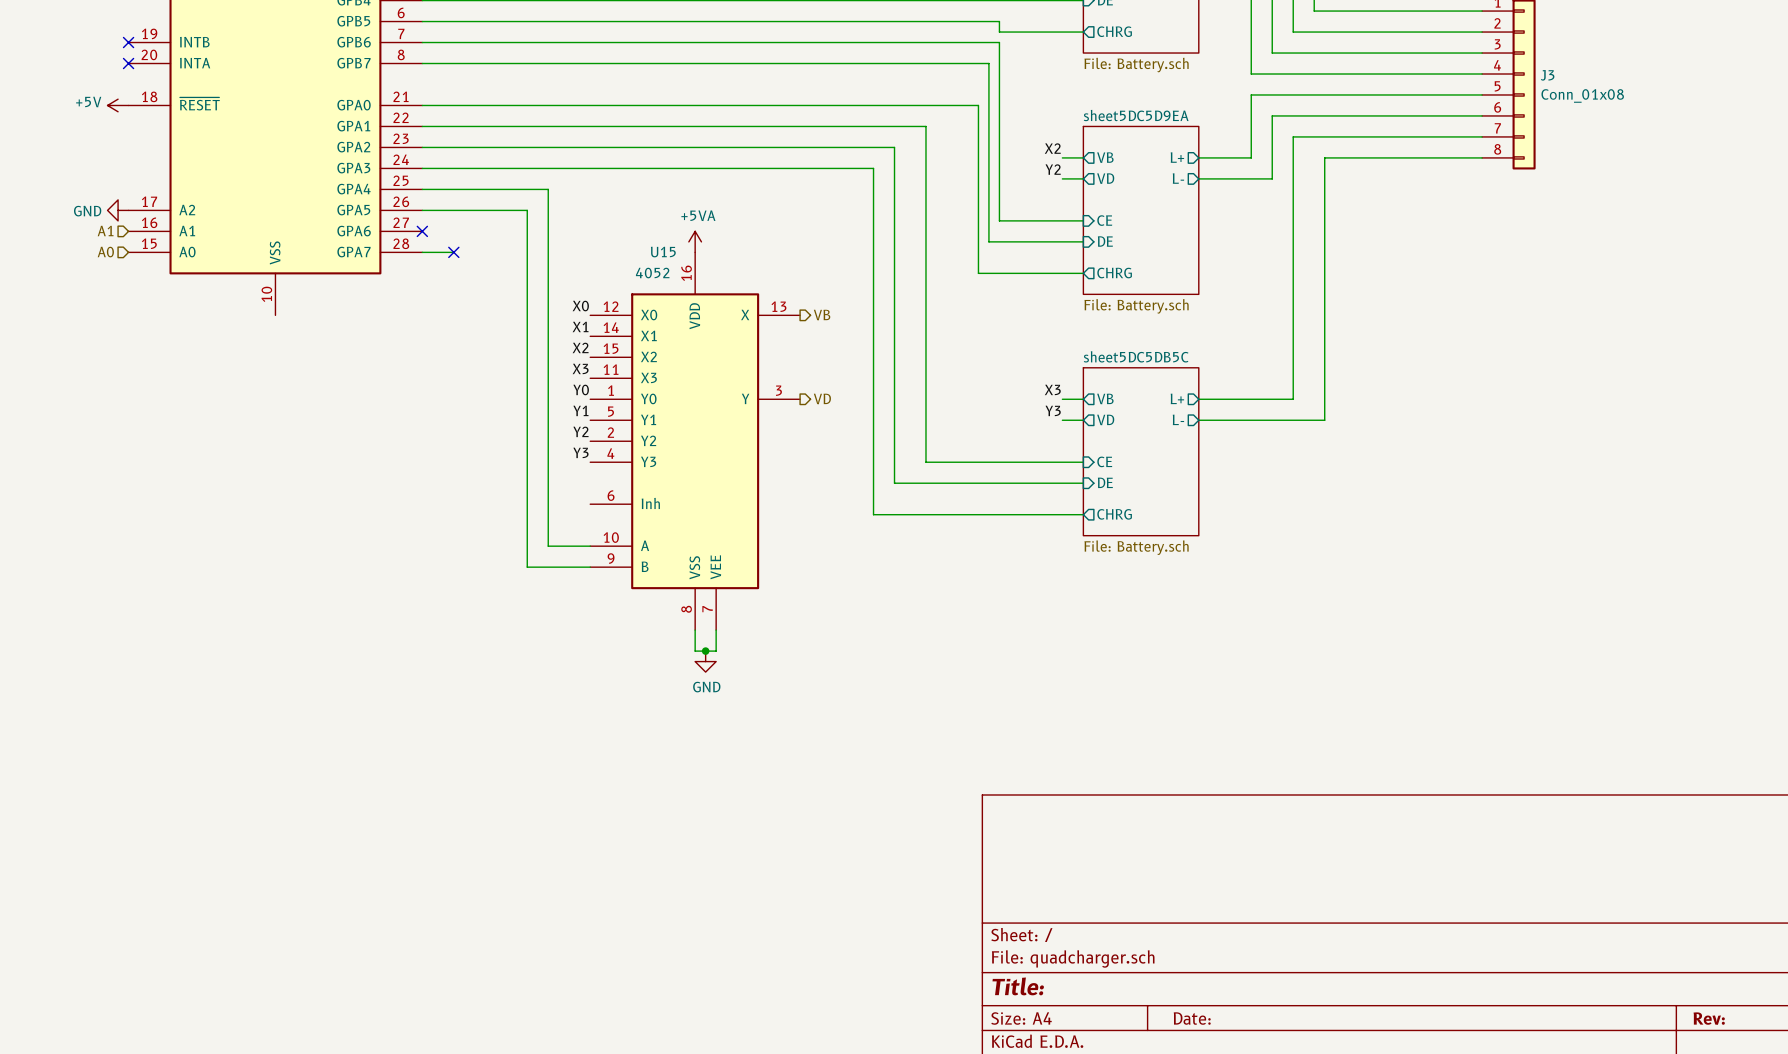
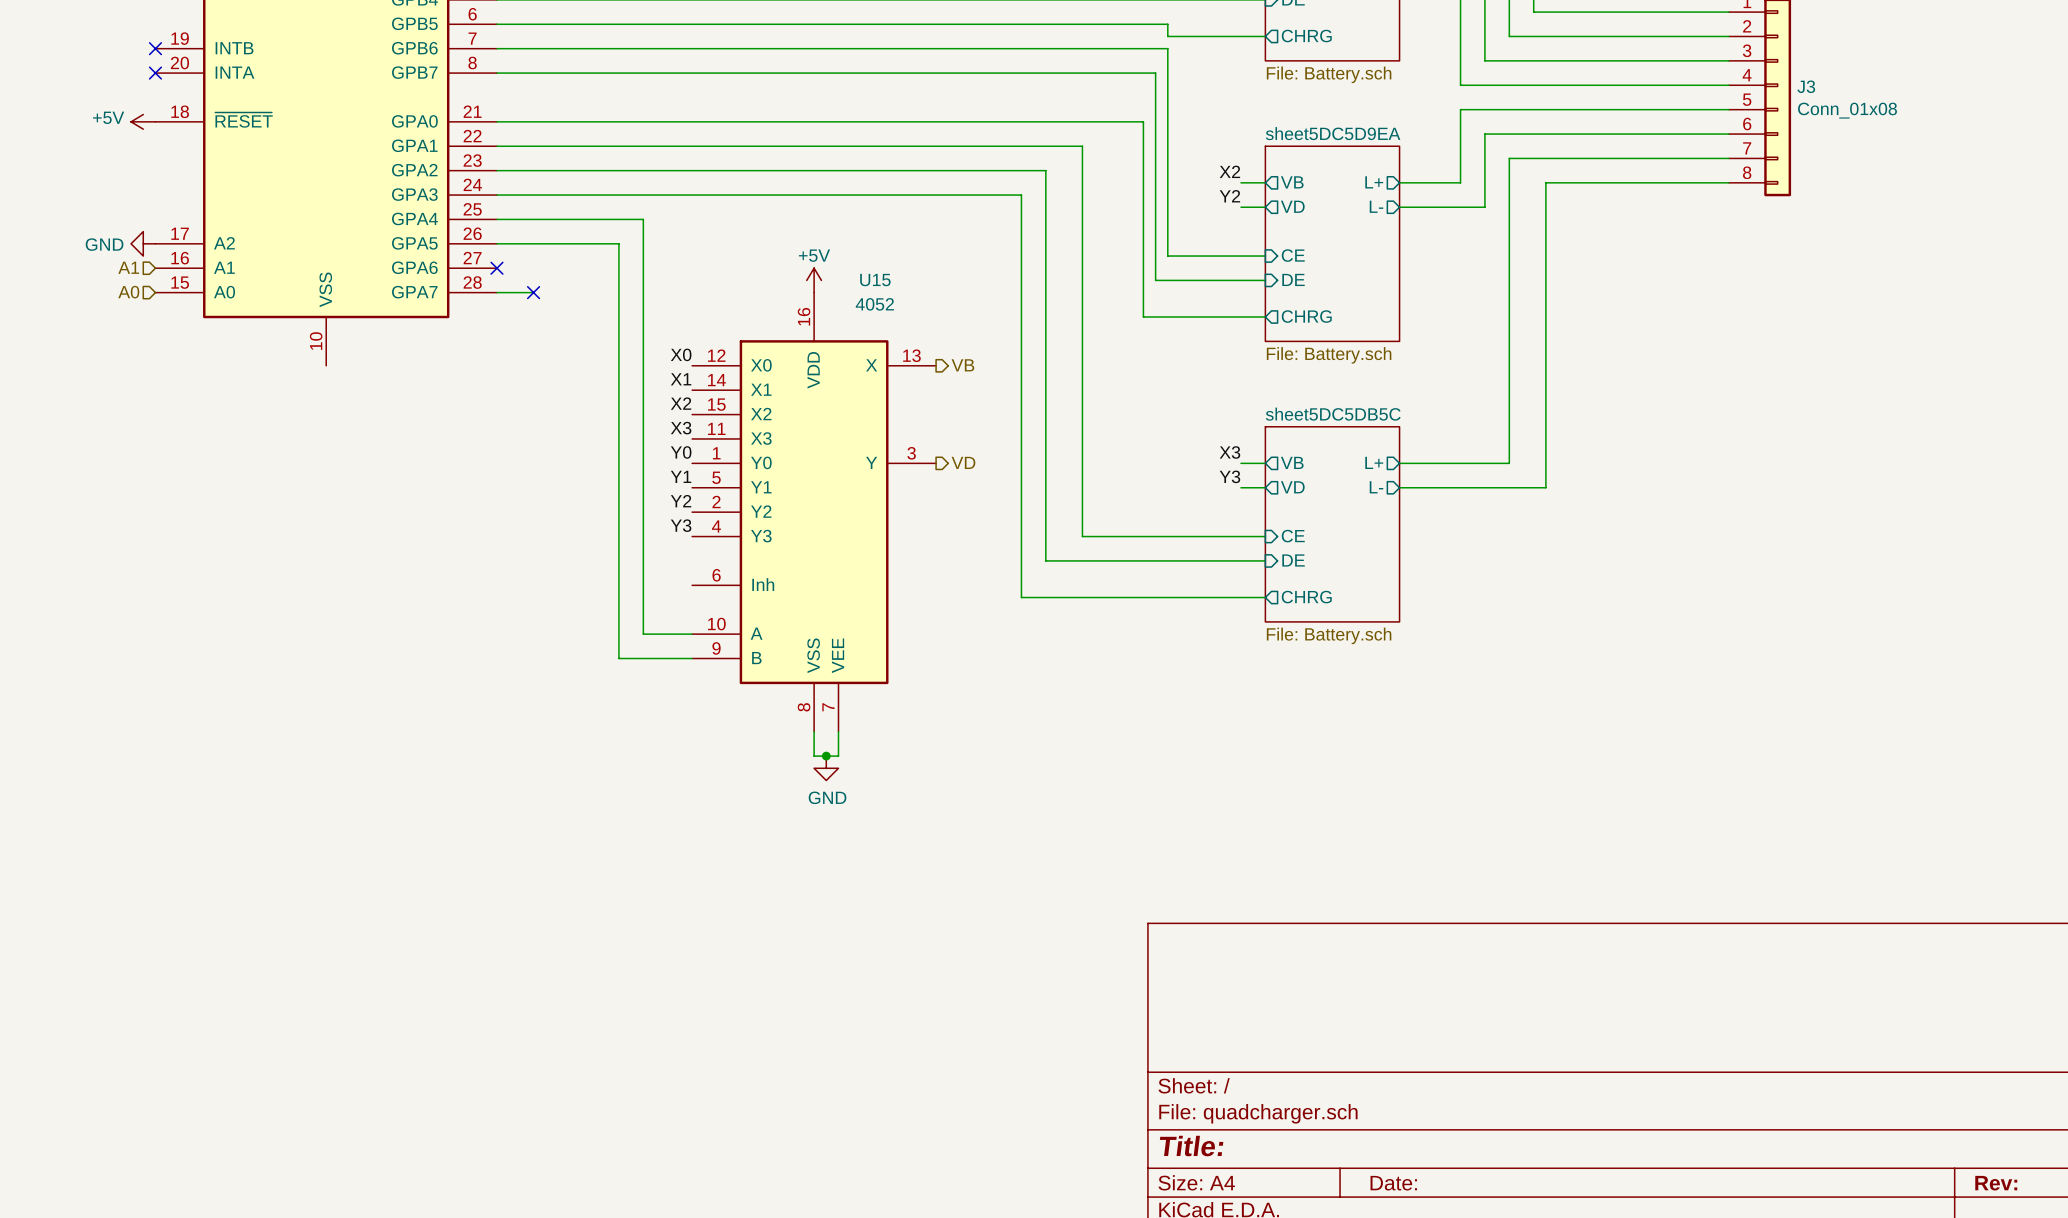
power symbol: +5VA (695, 241) -> +5V (814, 280)
U15 name position: U15 (663, 252) -> U15 (875, 280)
U15 value position: 4052 (652, 273) -> 4052 (874, 304)

